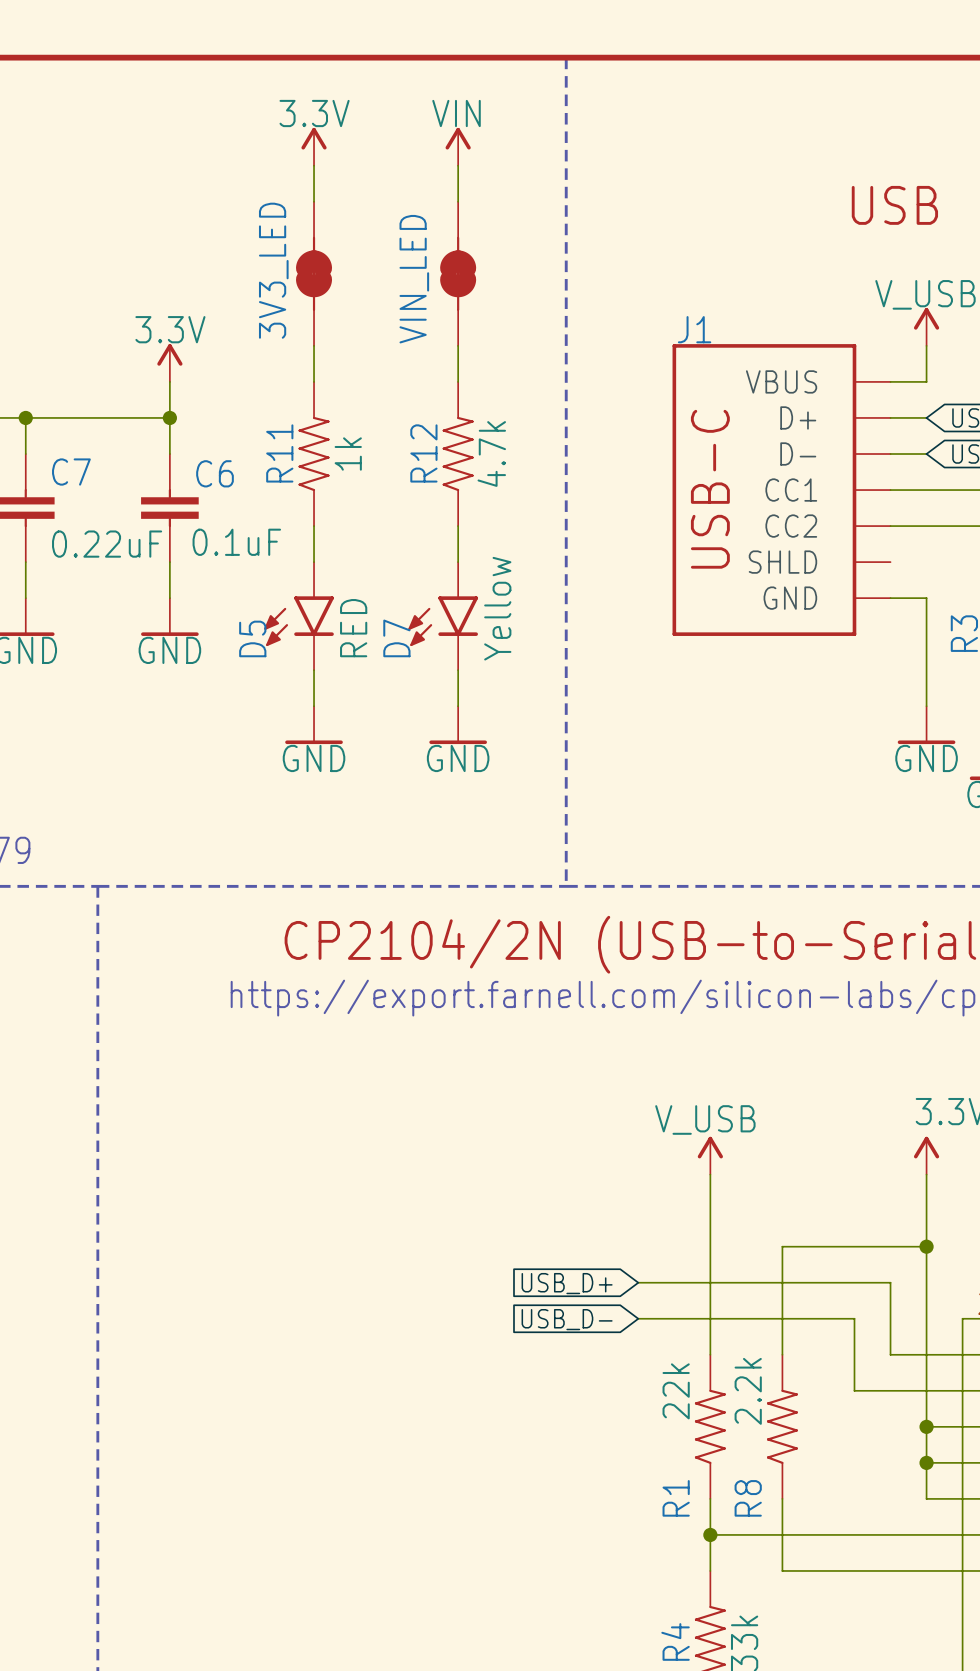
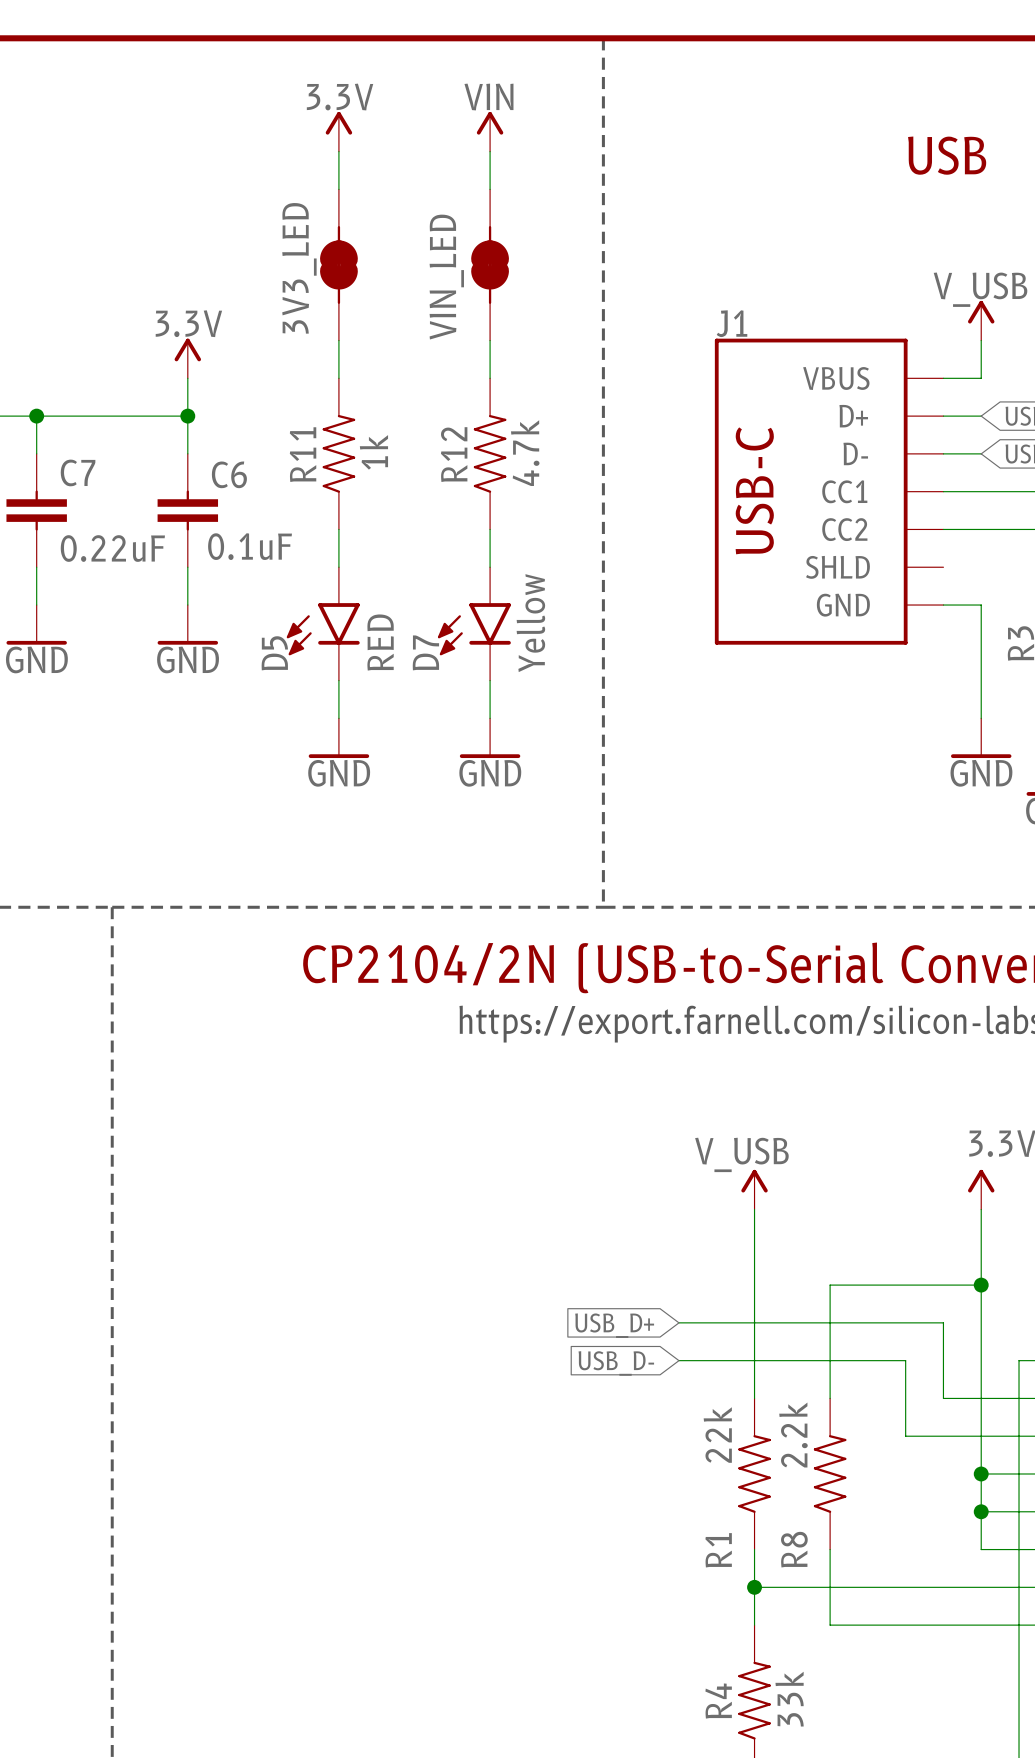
text position: USB (894, 205) -> USB (947, 155)

